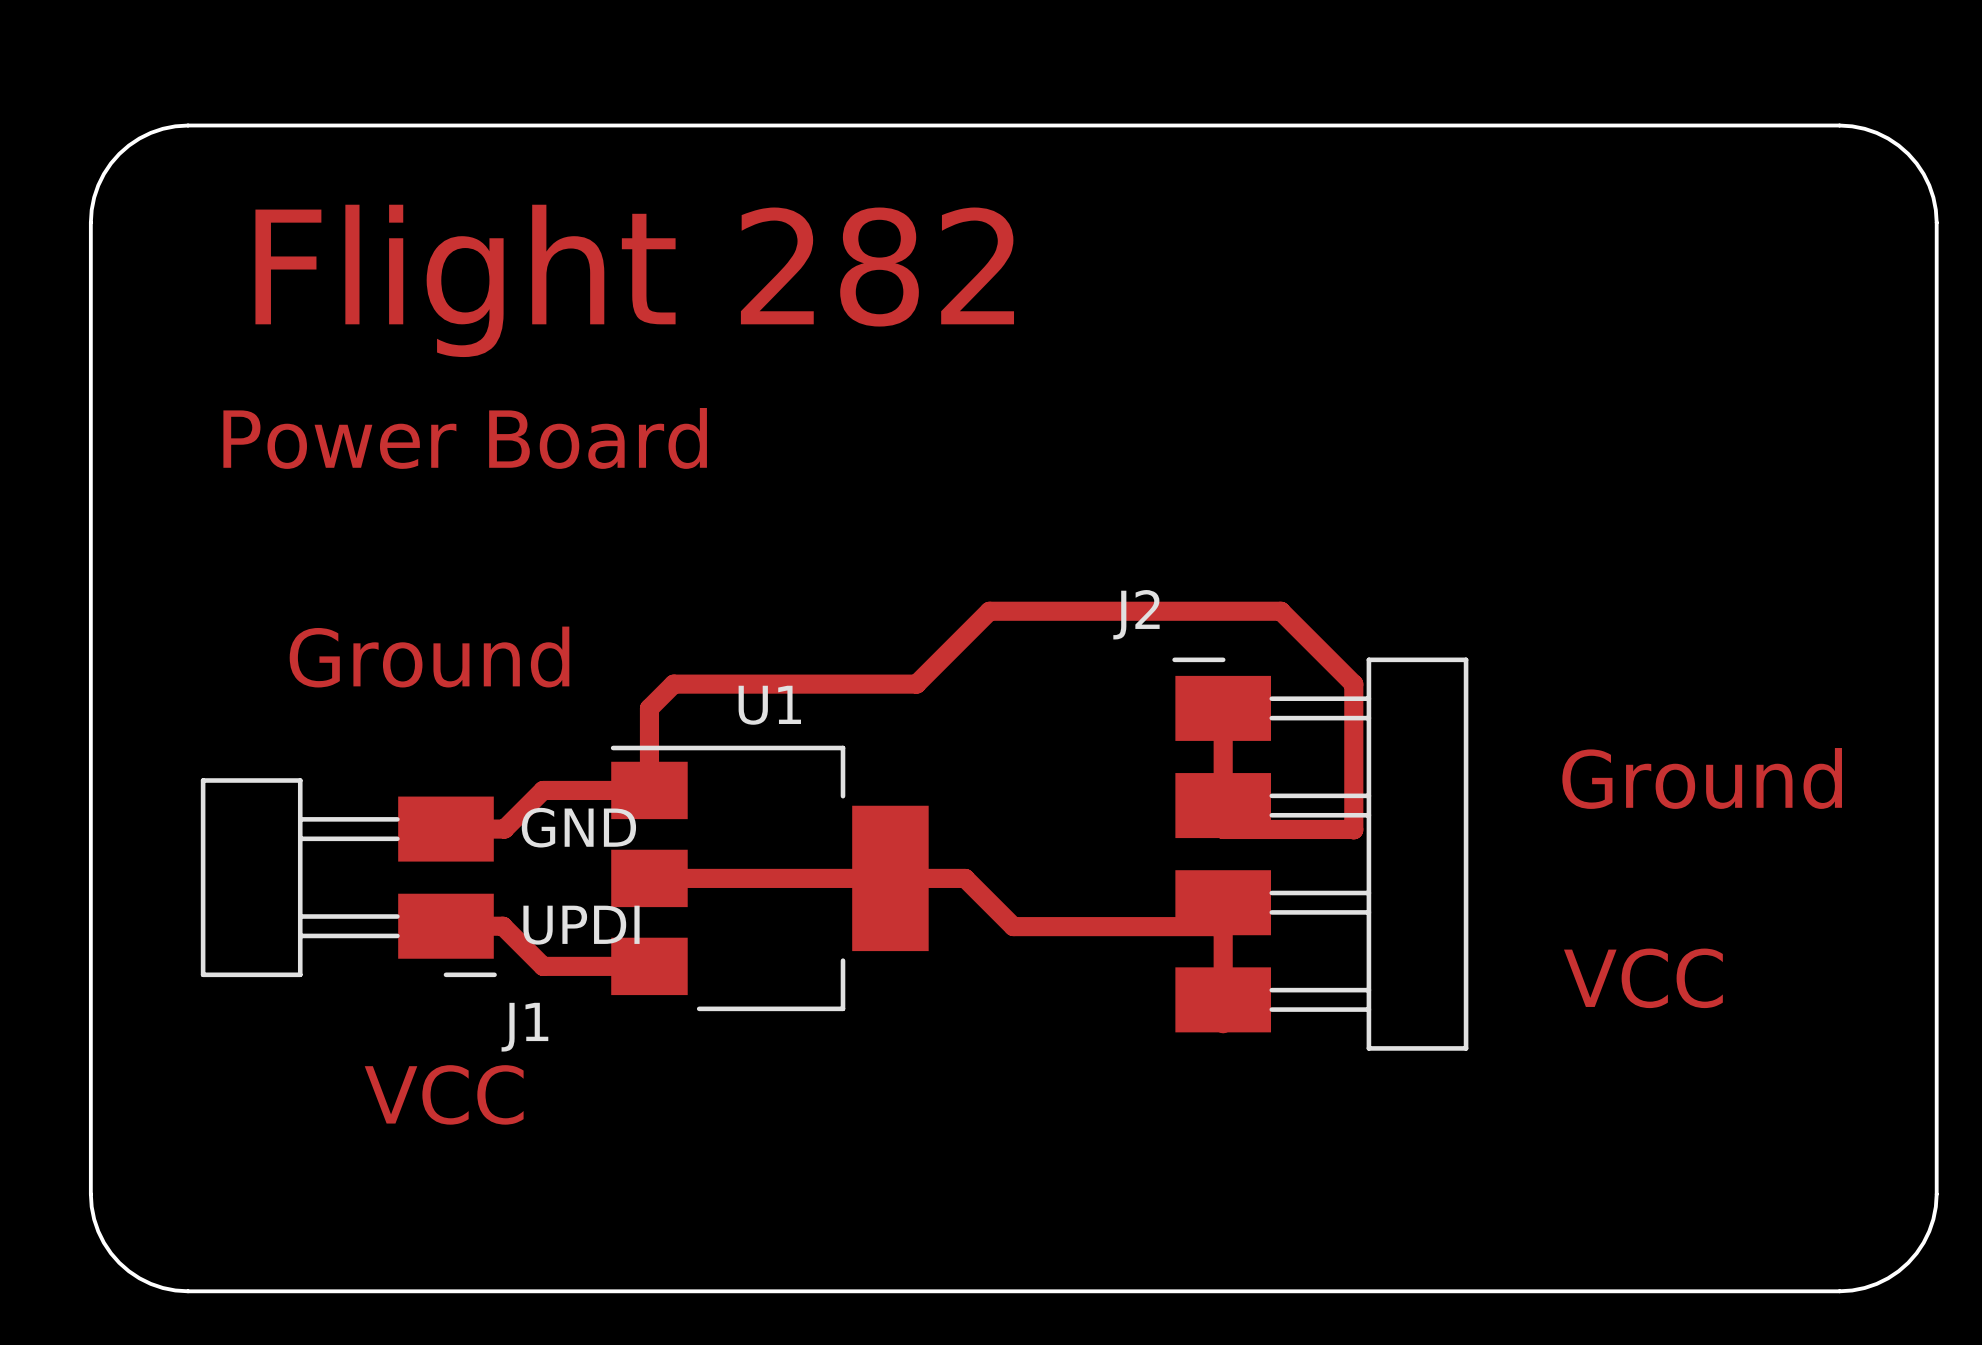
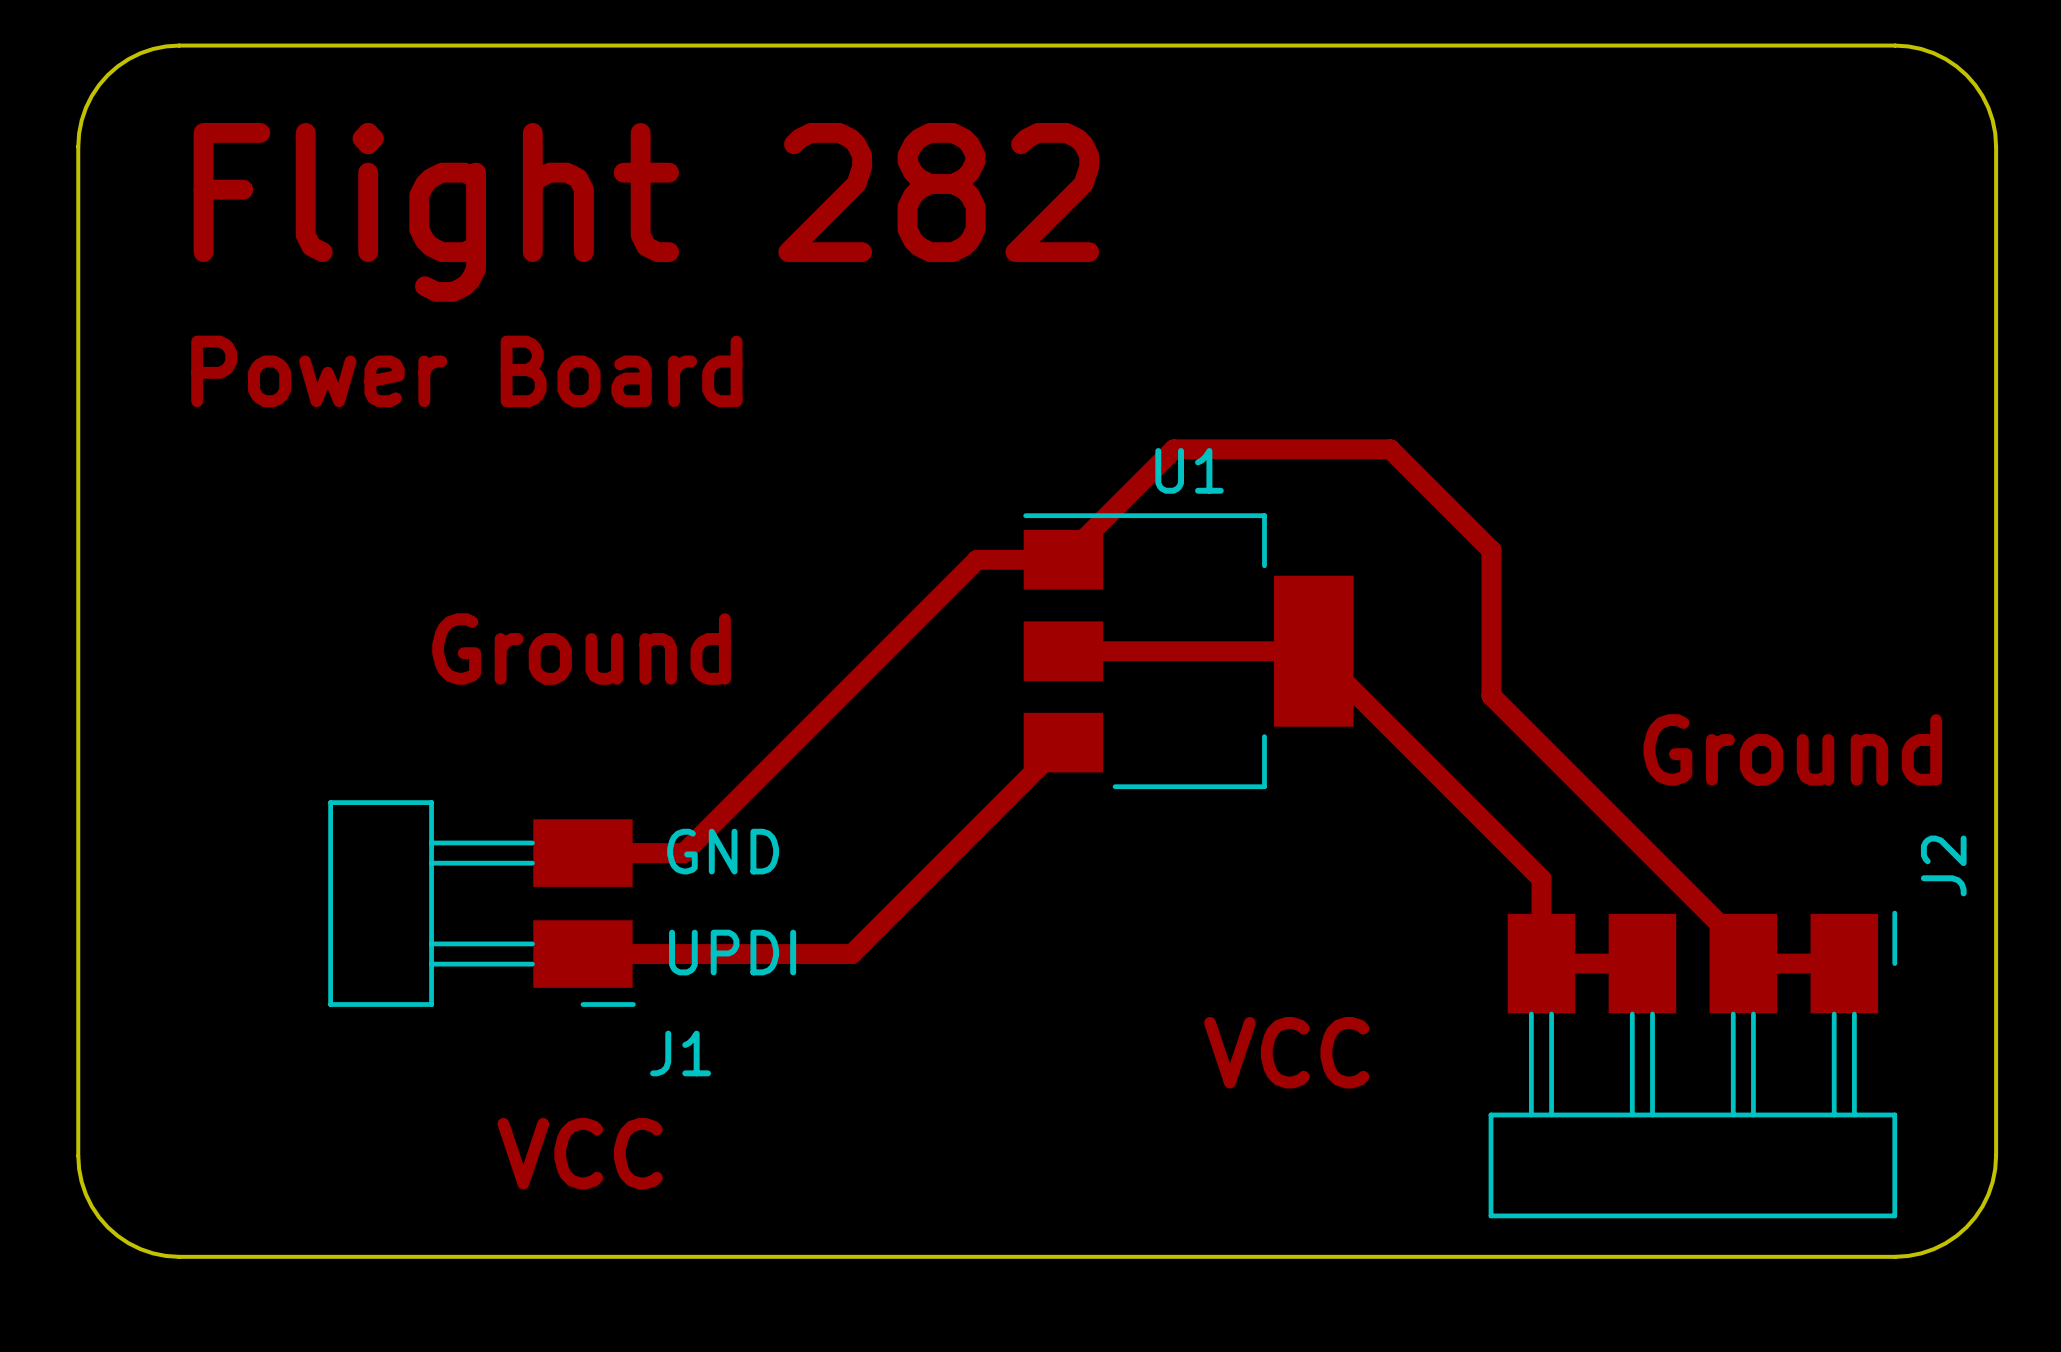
text position: Ground (429, 657) -> Ground (581, 648)
track: none -> (1063, 651) (1313, 651) (1541, 878) (1541, 963) (1642, 963)
track: (1223, 732) (1223, 829) (1353, 829) -> none
text position: Ground (1702, 778) -> Ground (1792, 749)
track: none -> (1063, 742) (851, 954) (582, 954)
track: (445, 829) (504, 829) (543, 790) (649, 790) (649, 708) (673, 684) (916, 684) (989, 611) (1280, 611) (1353, 684) (1353, 829) -> none
J2 rotation: 0° (1320, 854) -> 90° clockwise (1692, 1064)
J2 position: (1320, 854) -> (1692, 1064)
J1 position: (348, 877) -> (482, 903)
track: (649, 878) (965, 878) (1013, 926) (1223, 926) (1223, 1023) -> none
U1 position: (769, 878) -> (1188, 651)
track: none -> (582, 853) (683, 853) (977, 559) (1063, 559) (1173, 449) (1390, 449) (1491, 550) (1491, 695) (1743, 947) (1743, 963) (1844, 963)
track: (445, 926) (502, 926) (543, 966) (649, 966) -> none
text: VCC (1643, 978) -> none
text position: VCC (444, 1094) -> VCC (580, 1153)
text: none -> VCC (1286, 1052)

